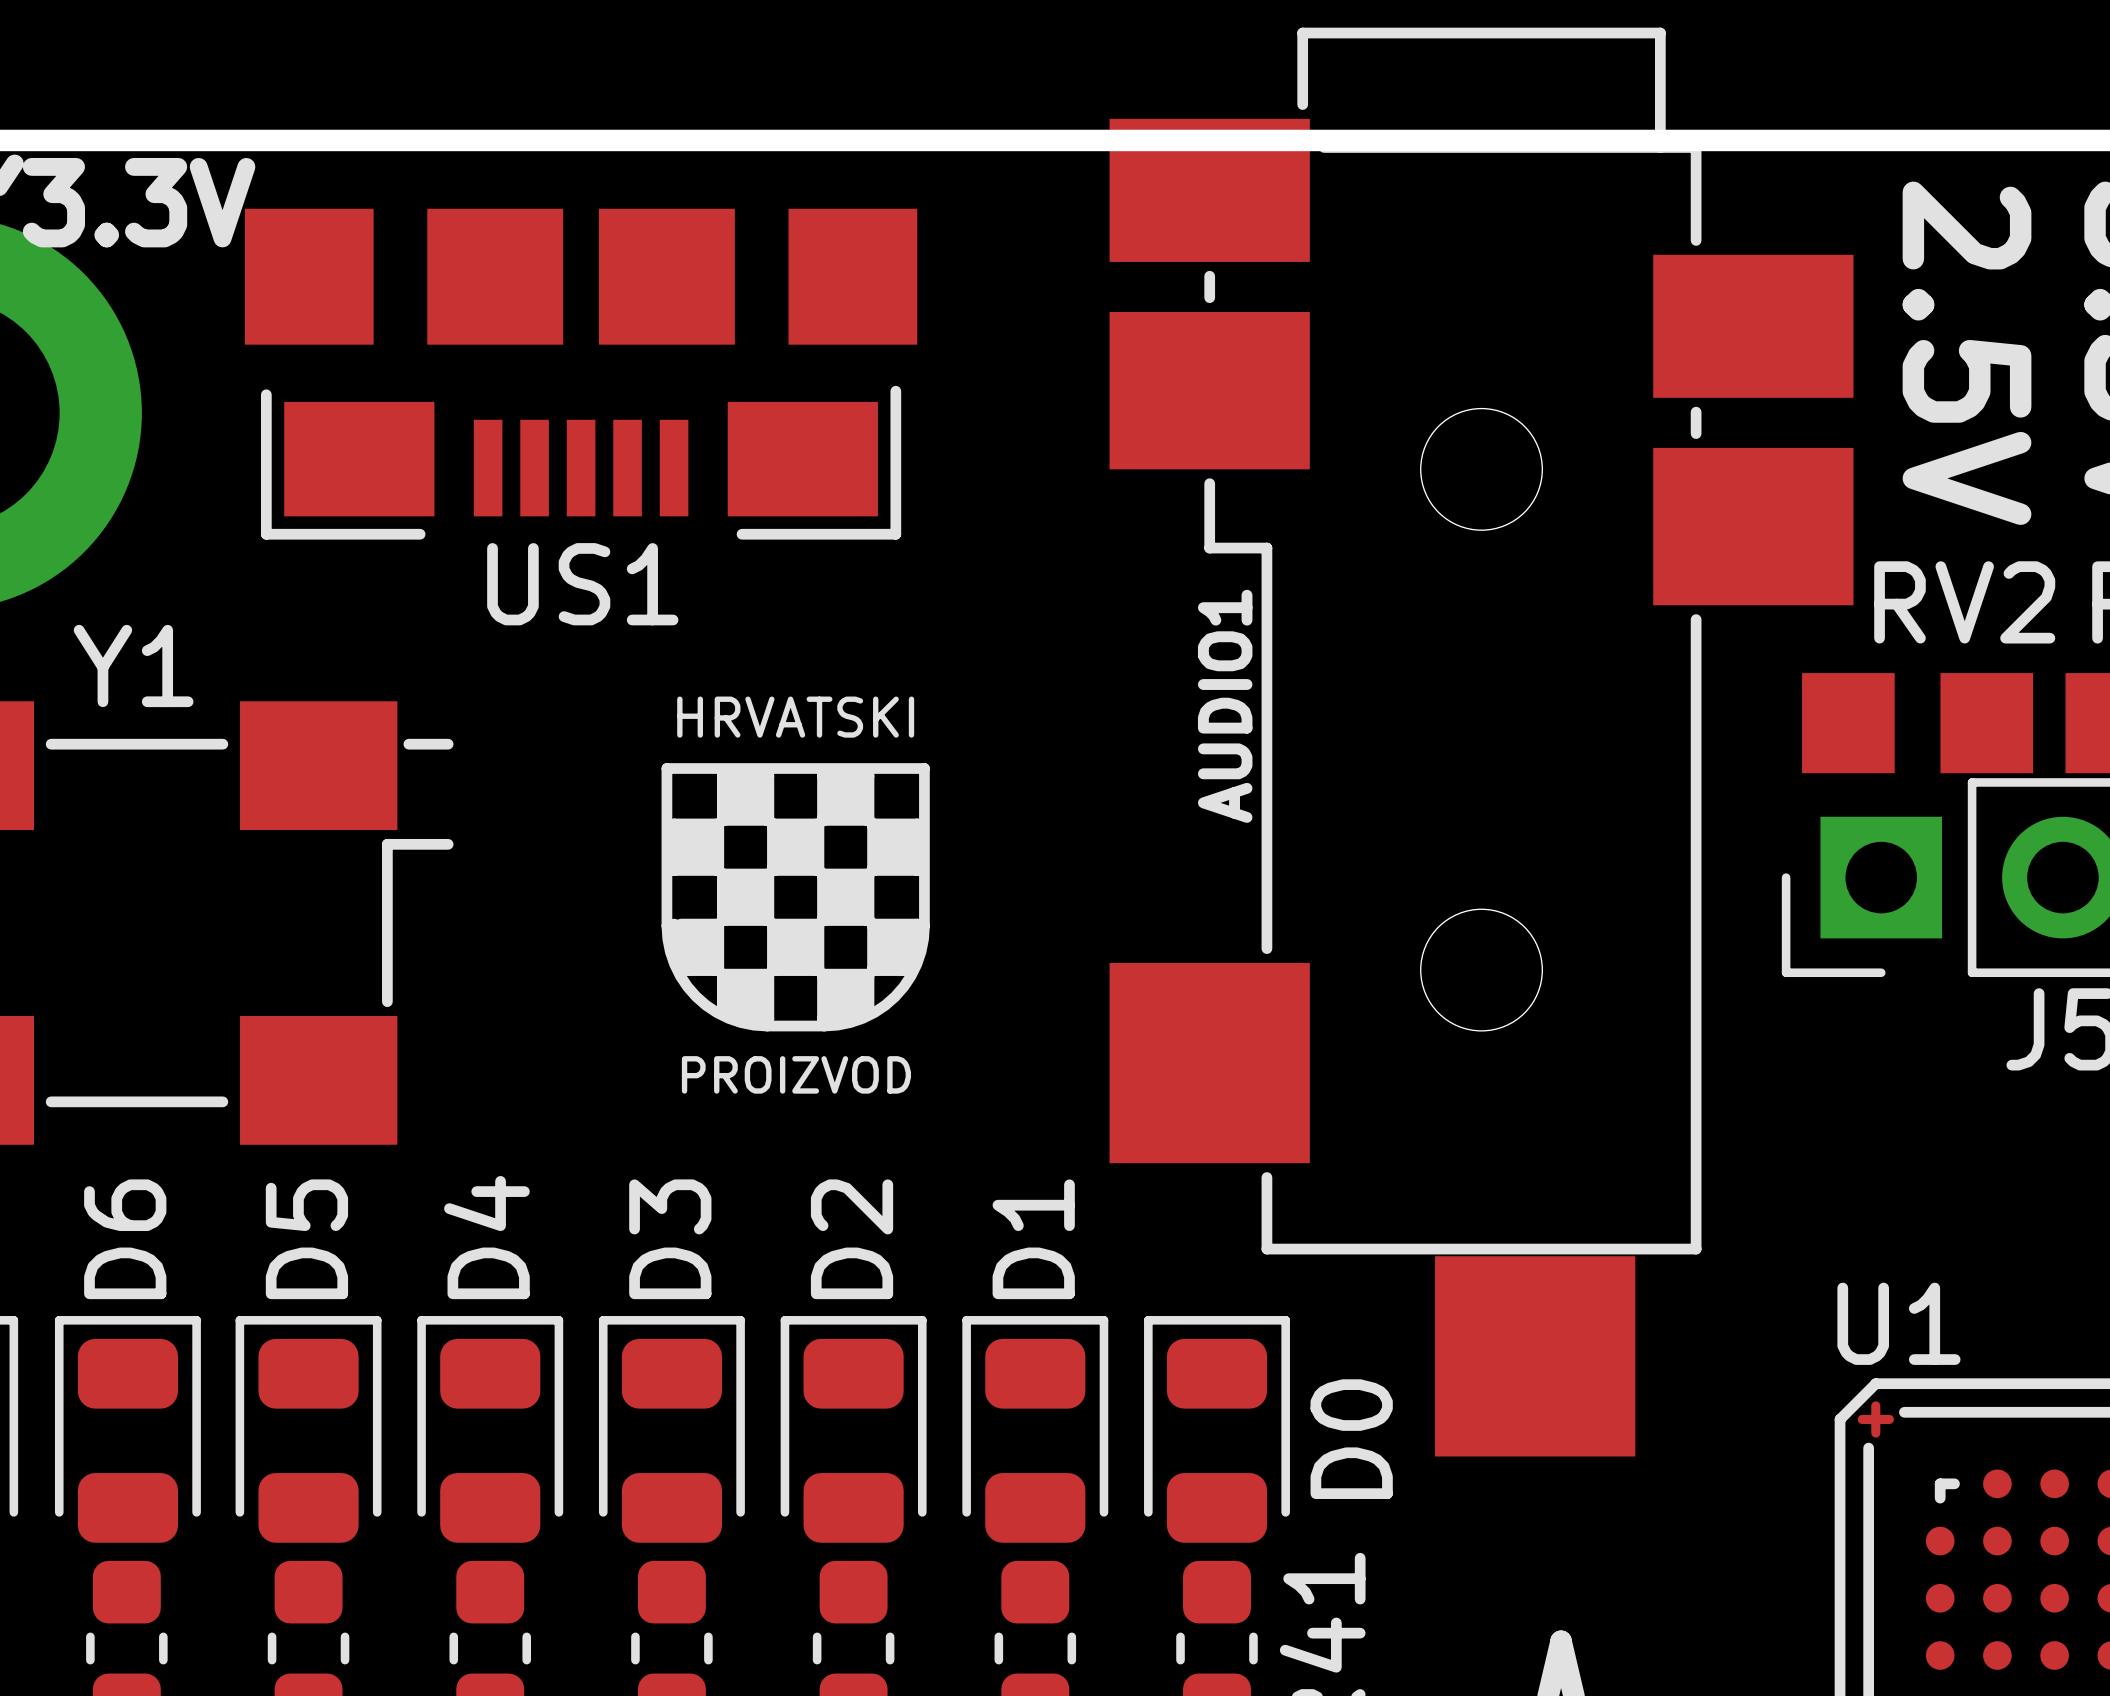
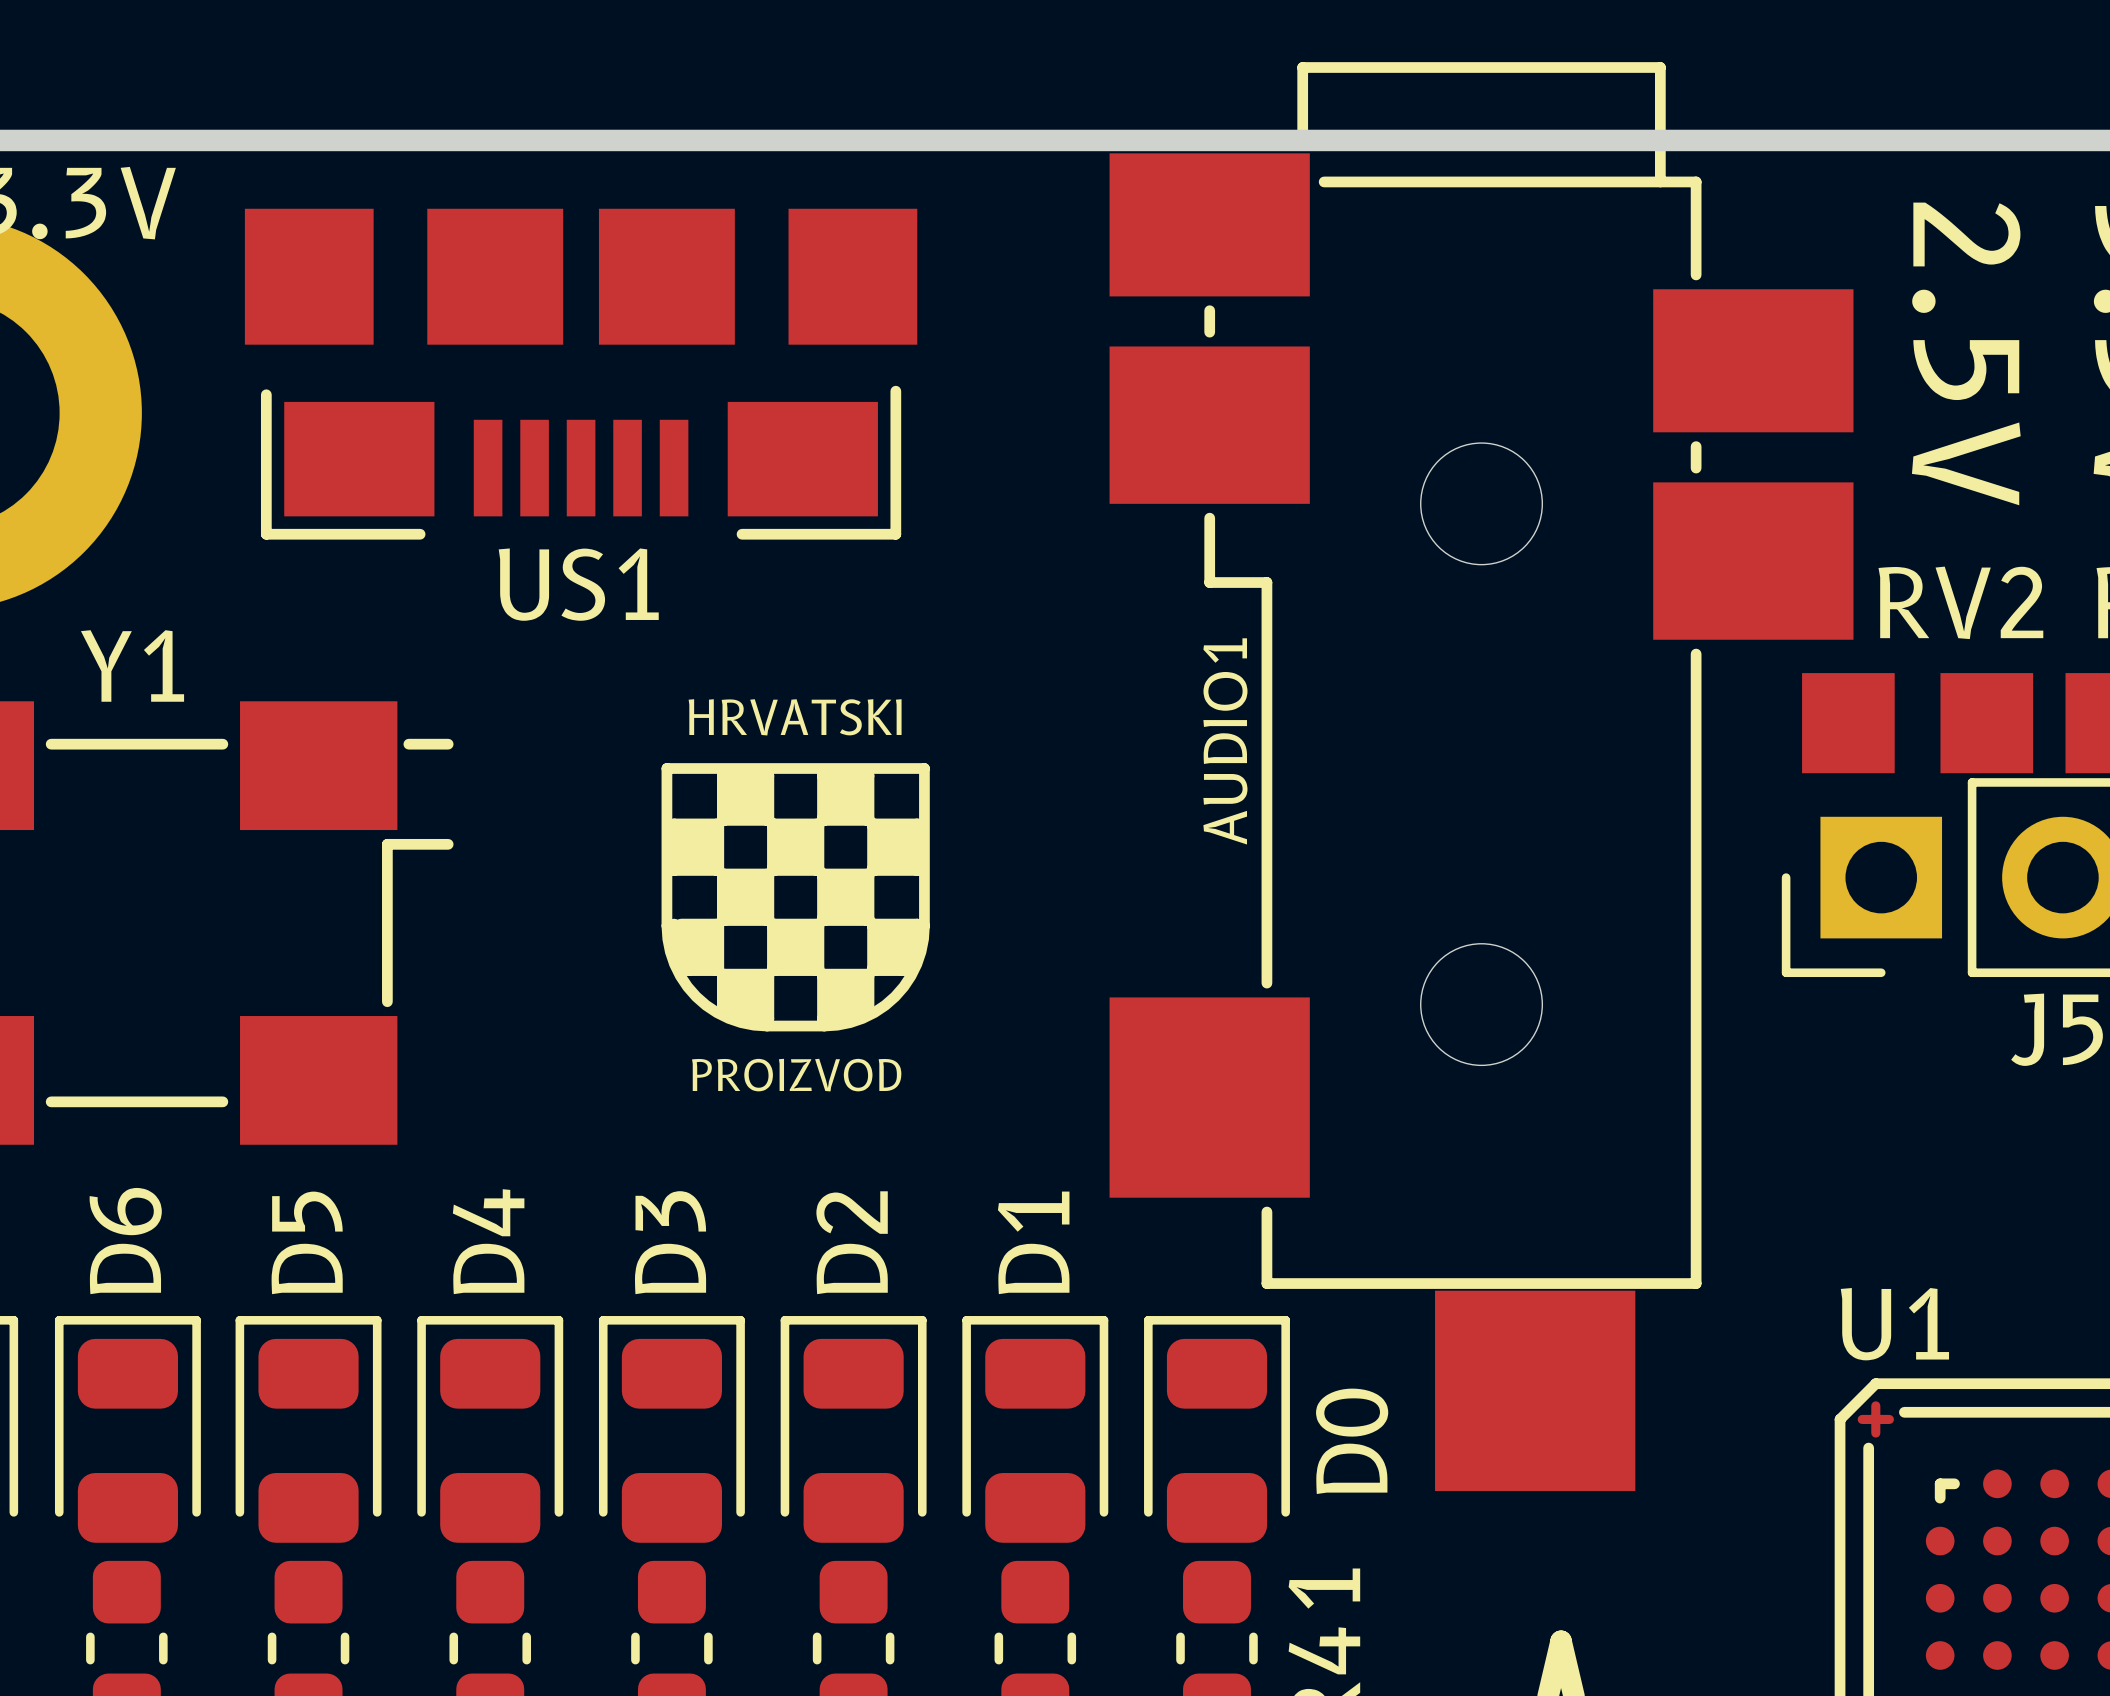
AUDIO1 position: (1481, 742) -> (1481, 776)

